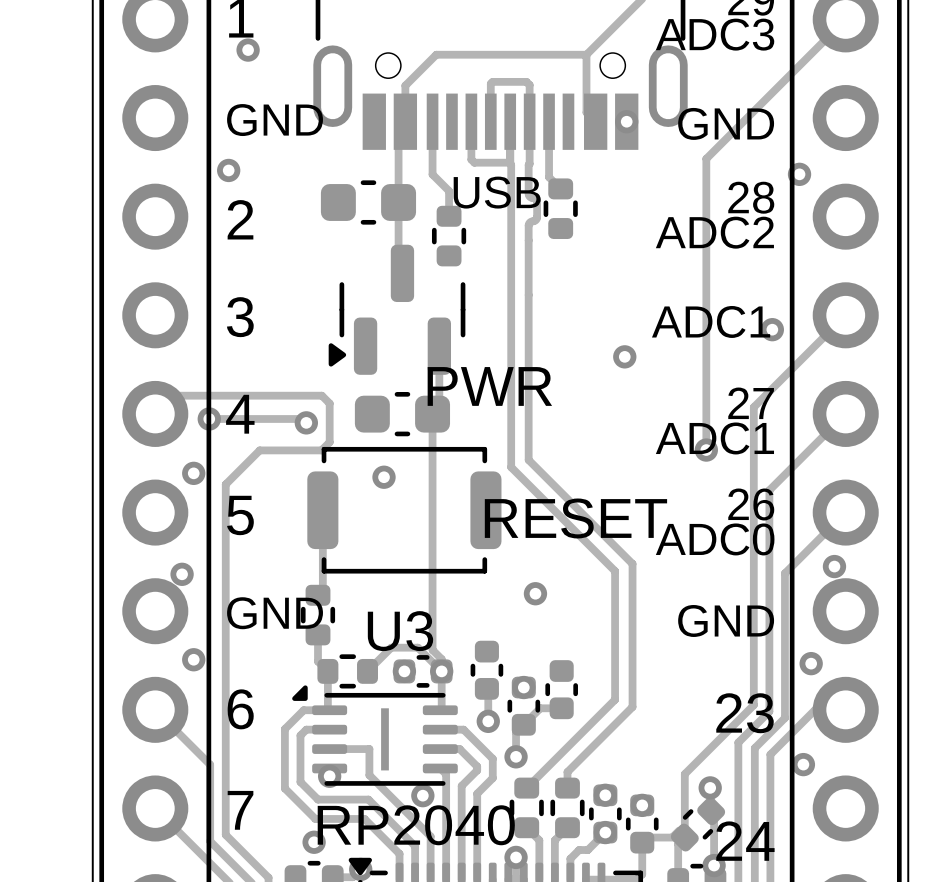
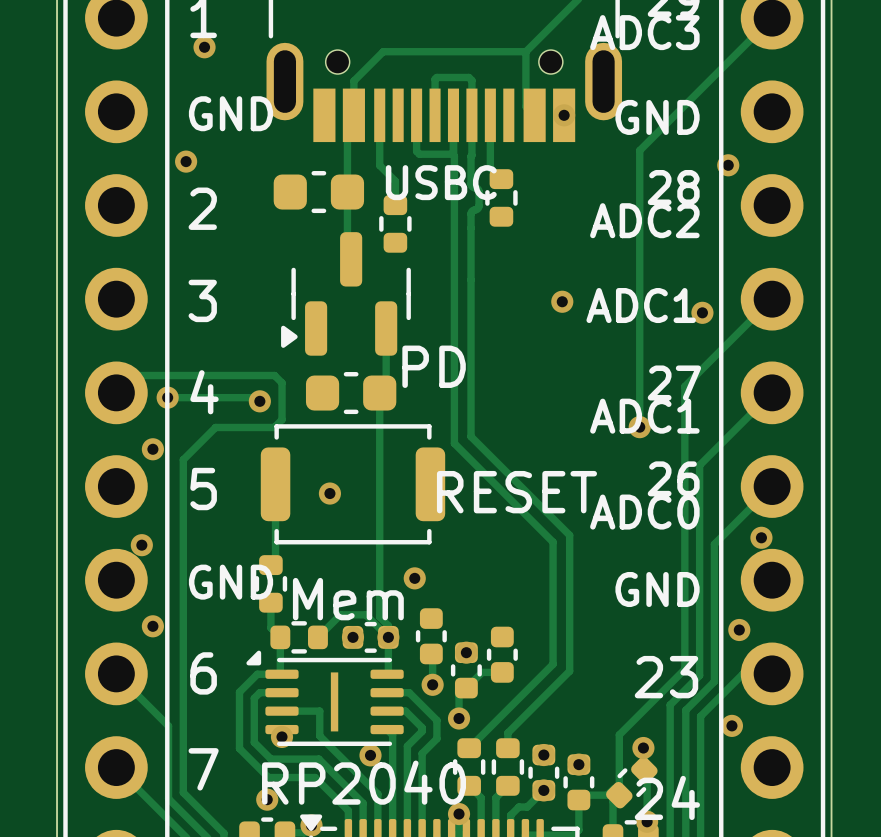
USB name: USB (497, 192) -> USBC (441, 182)
via position: (624, 356) -> (562, 301)
PWR name: PWR (489, 386) -> PD (434, 366)
via position: (384, 477) -> (329, 493)
via position: (535, 593) -> (414, 578)
U3 name: U3 (400, 631) -> Mem (348, 599)

